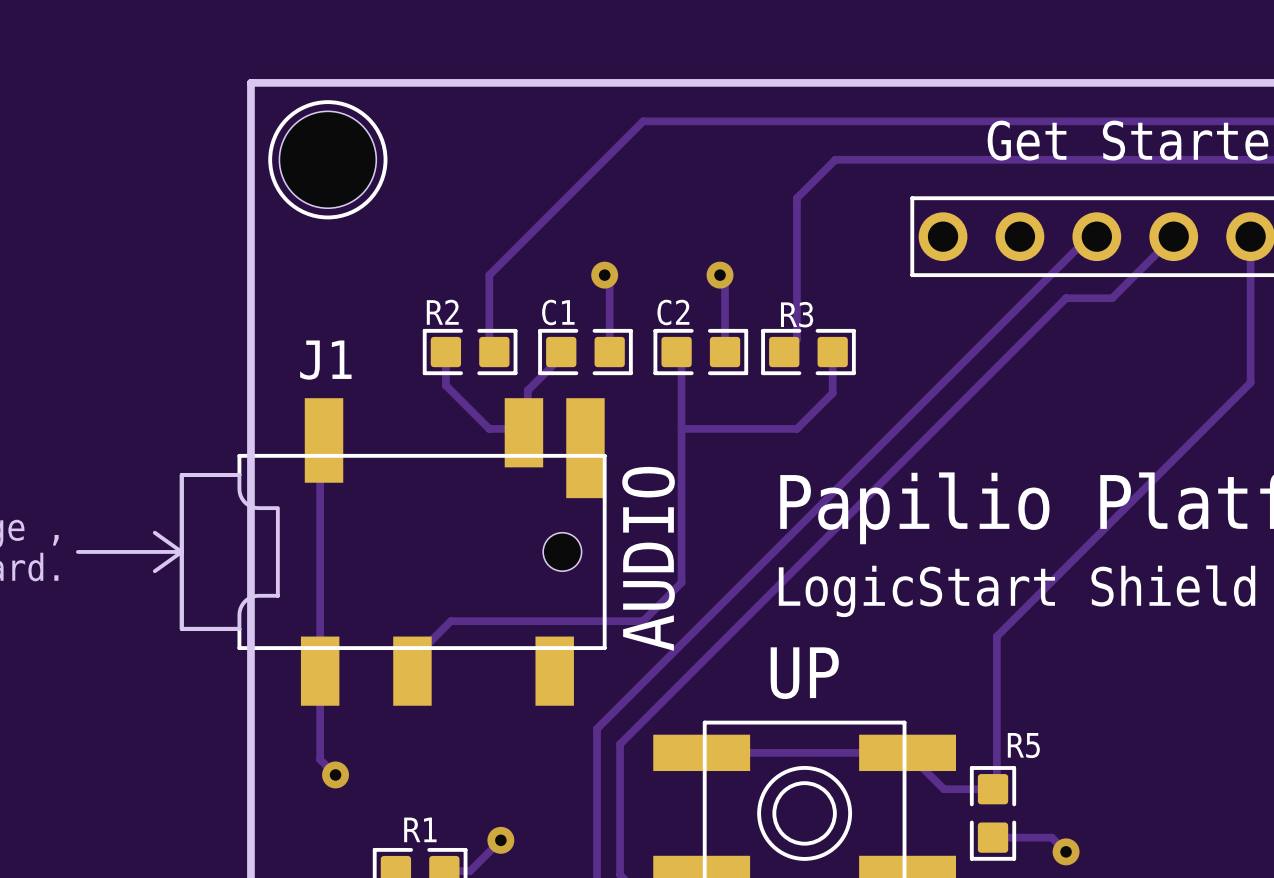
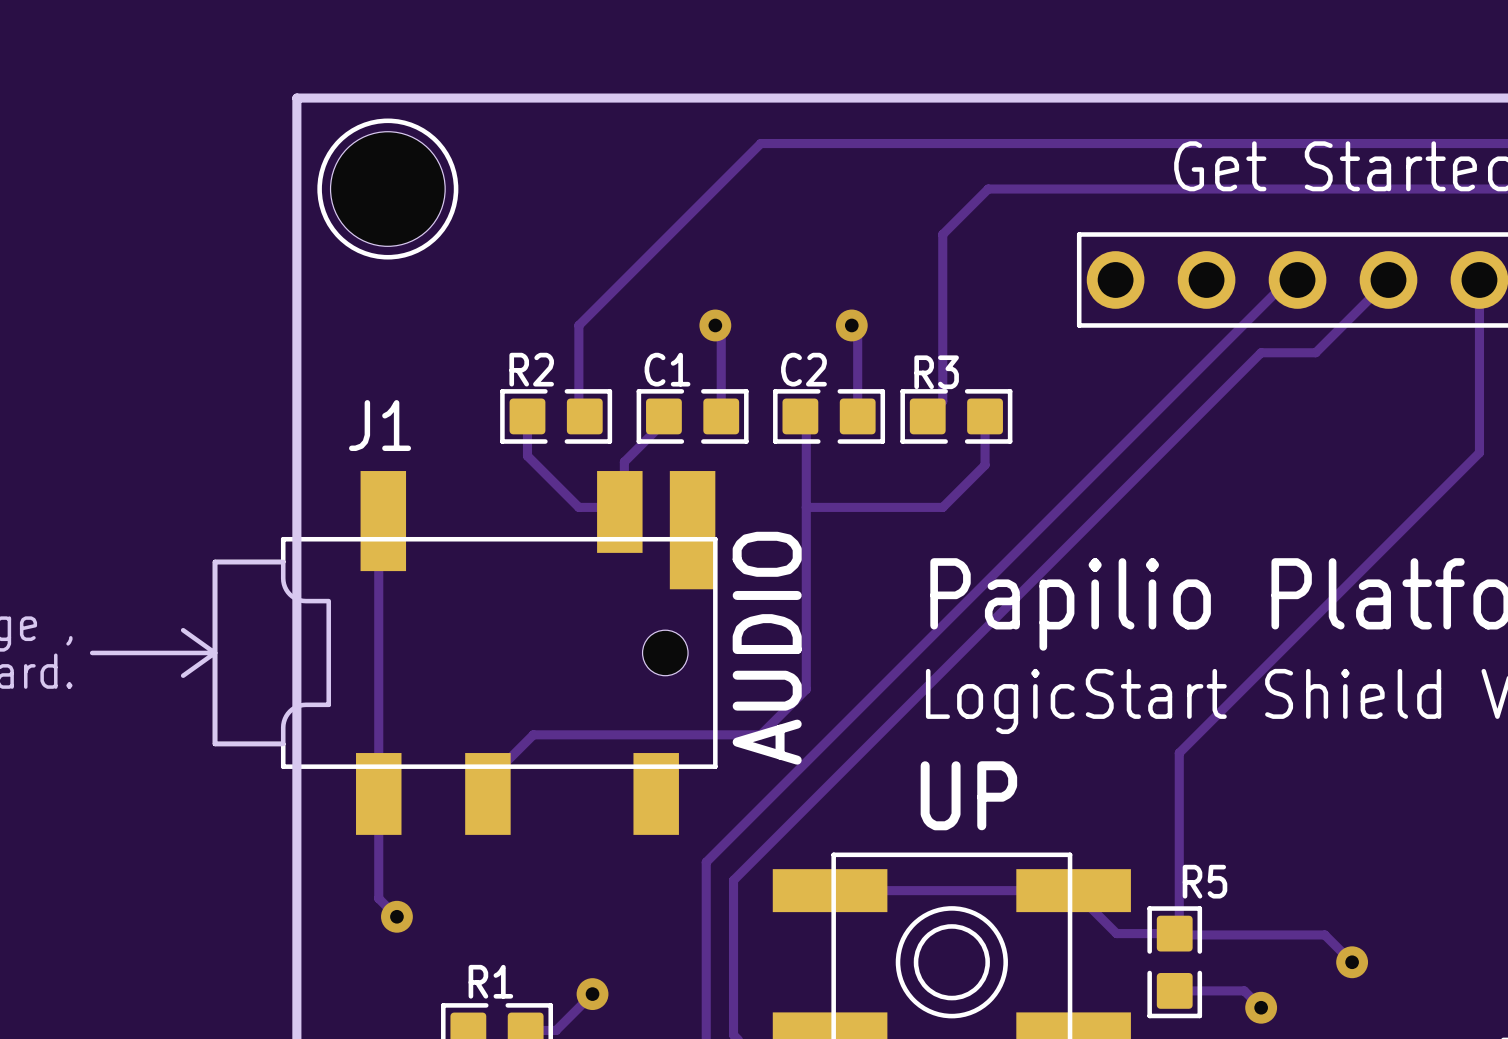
track: none -> (1174, 933) (1324, 934) (1352, 962)
via: none -> (1352, 962)

